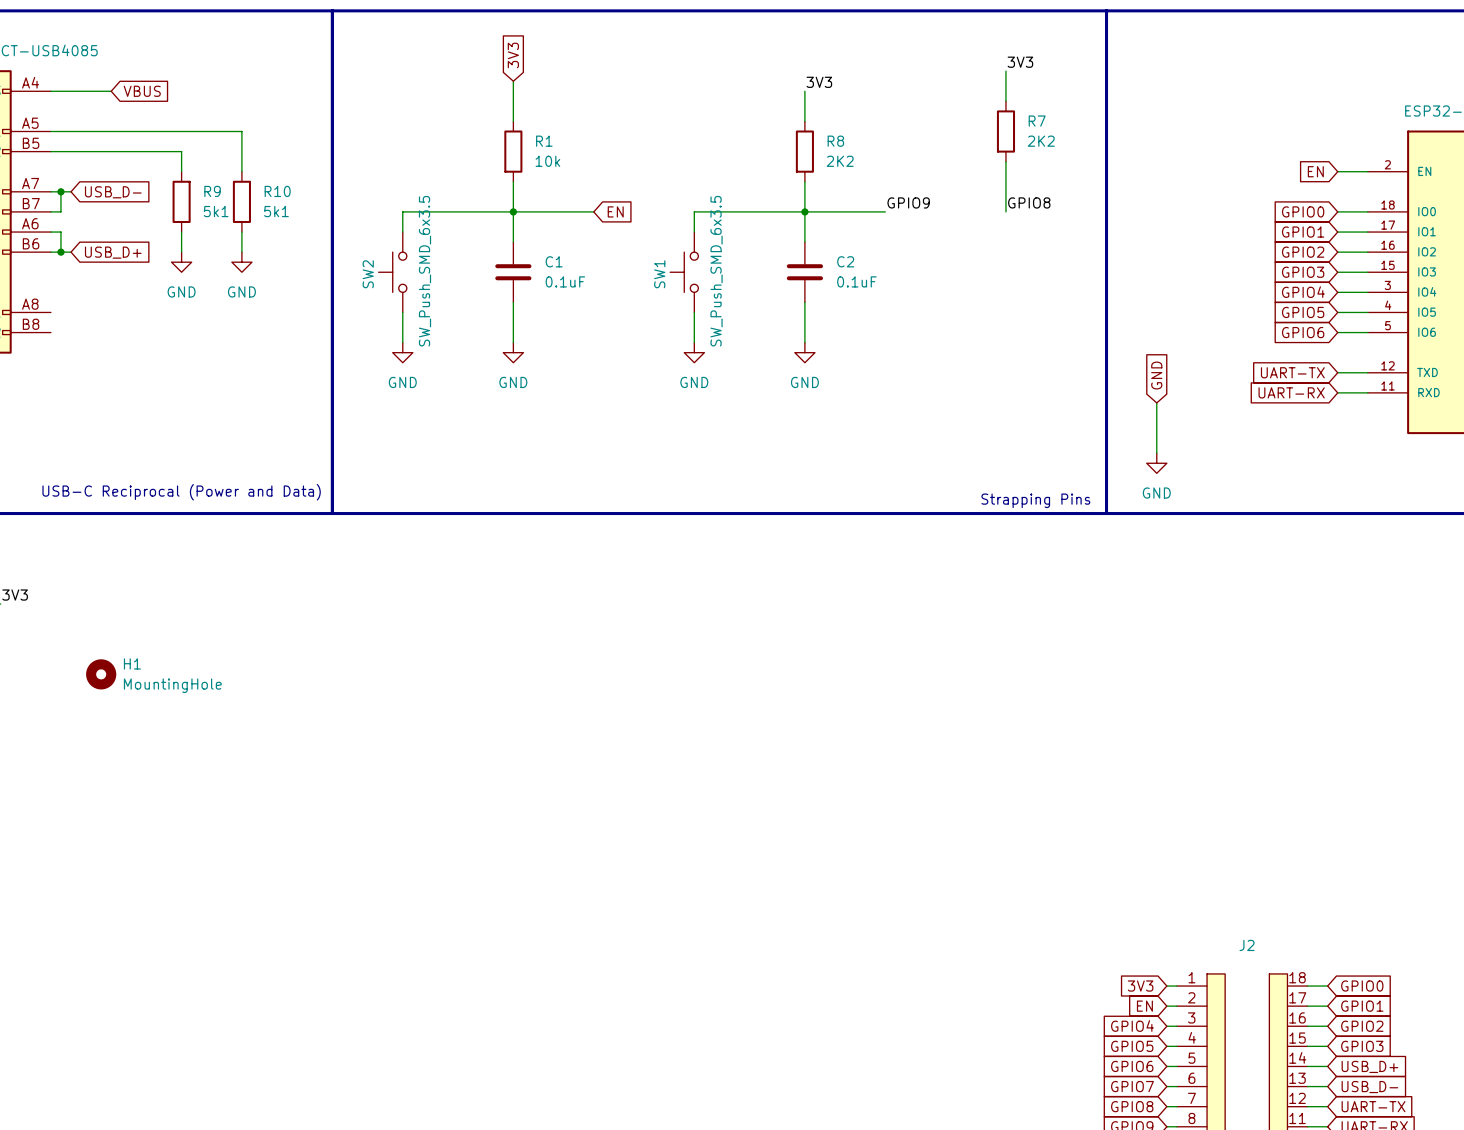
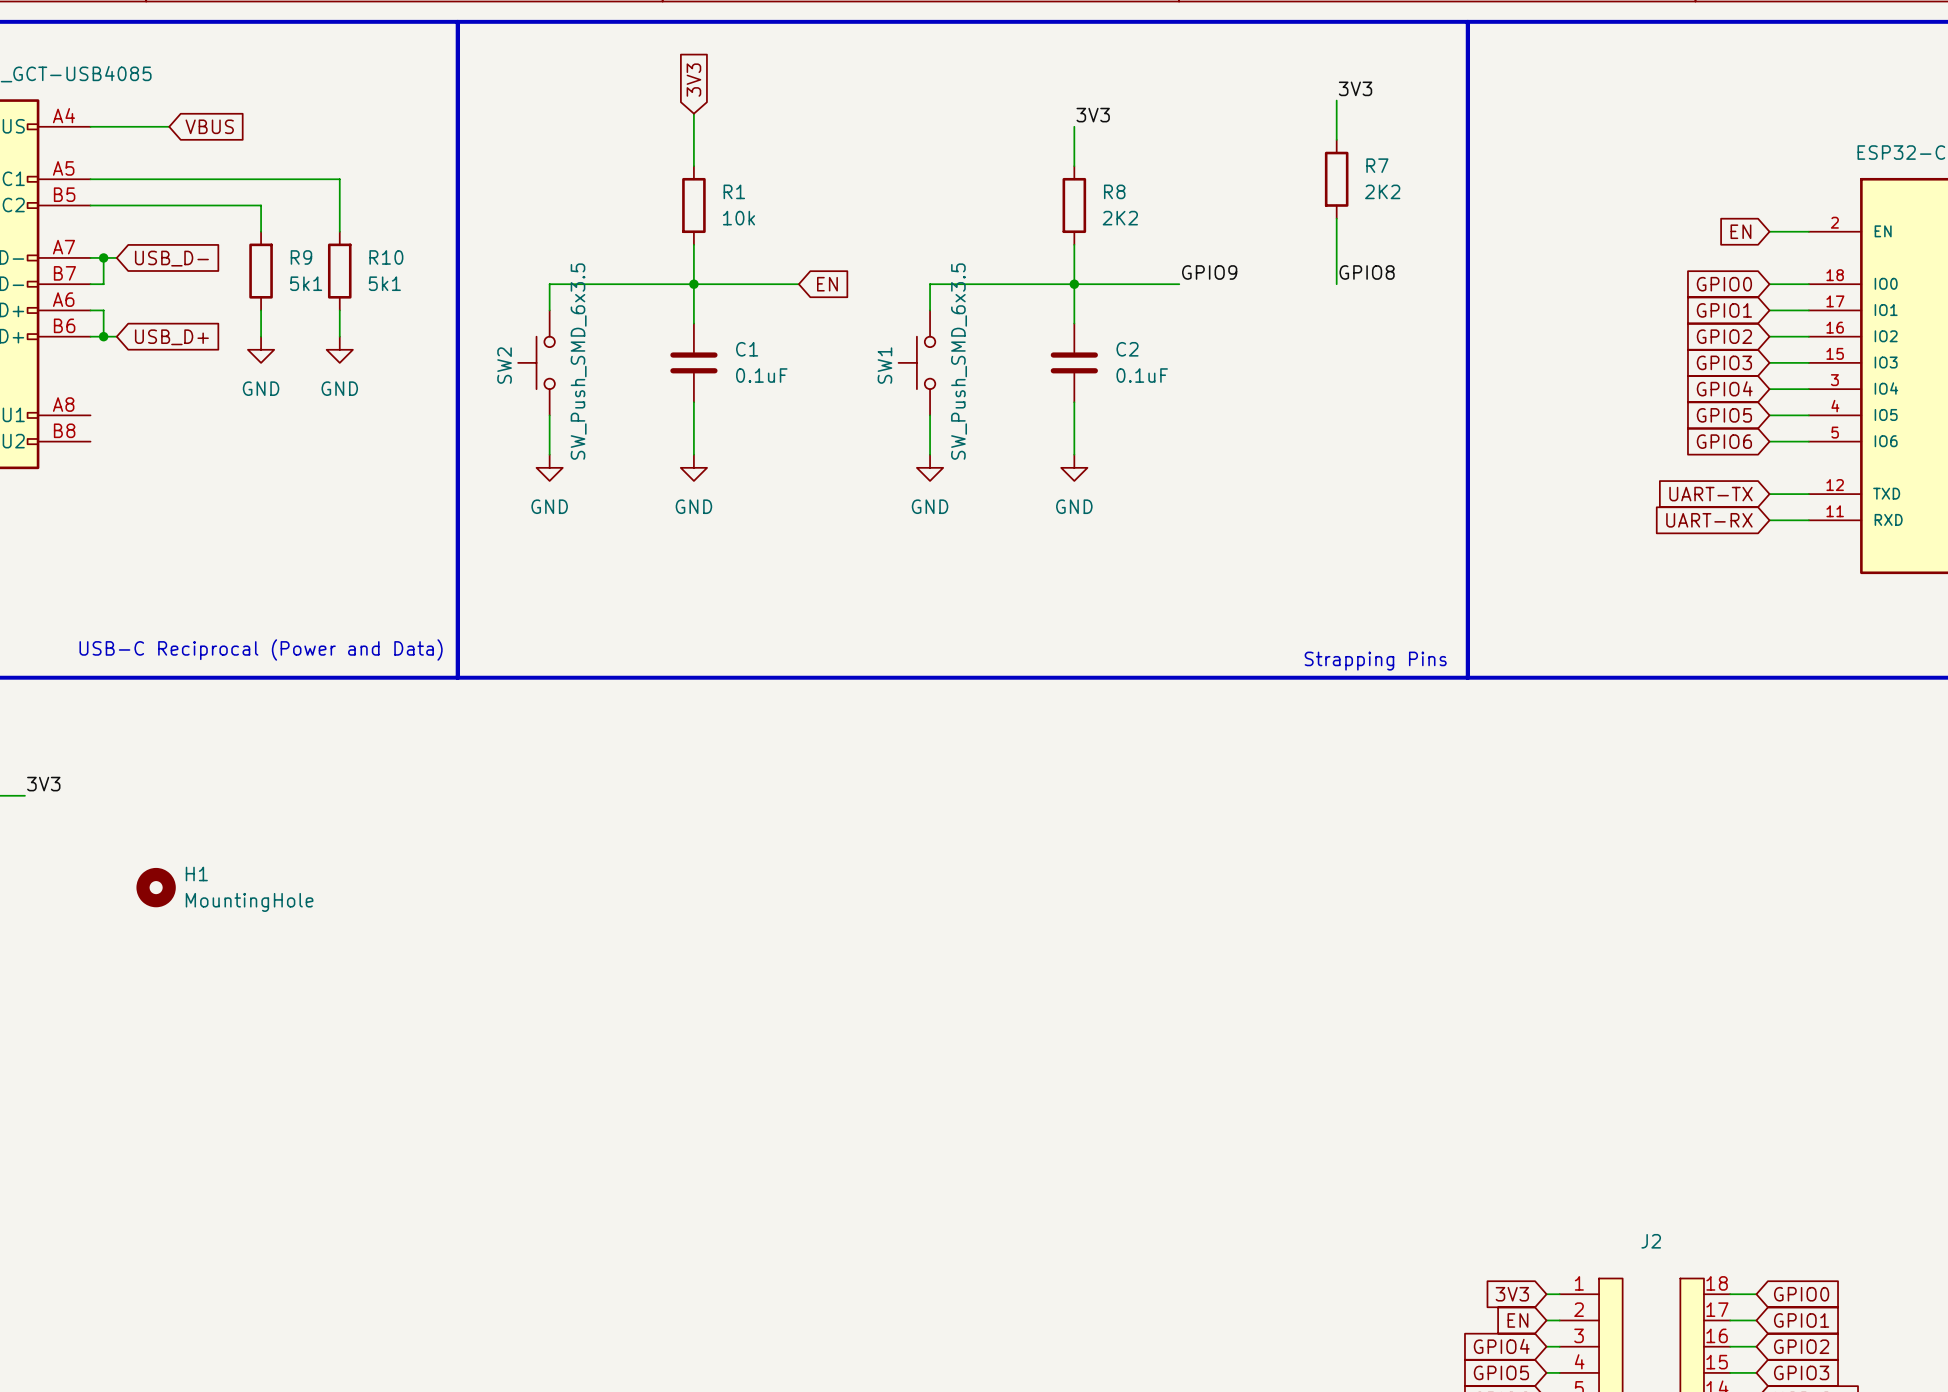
global label: GND (1156, 375) -> none
wire: (1156, 402) (1156, 453) -> none
power symbol: GND (1156, 463) -> none

